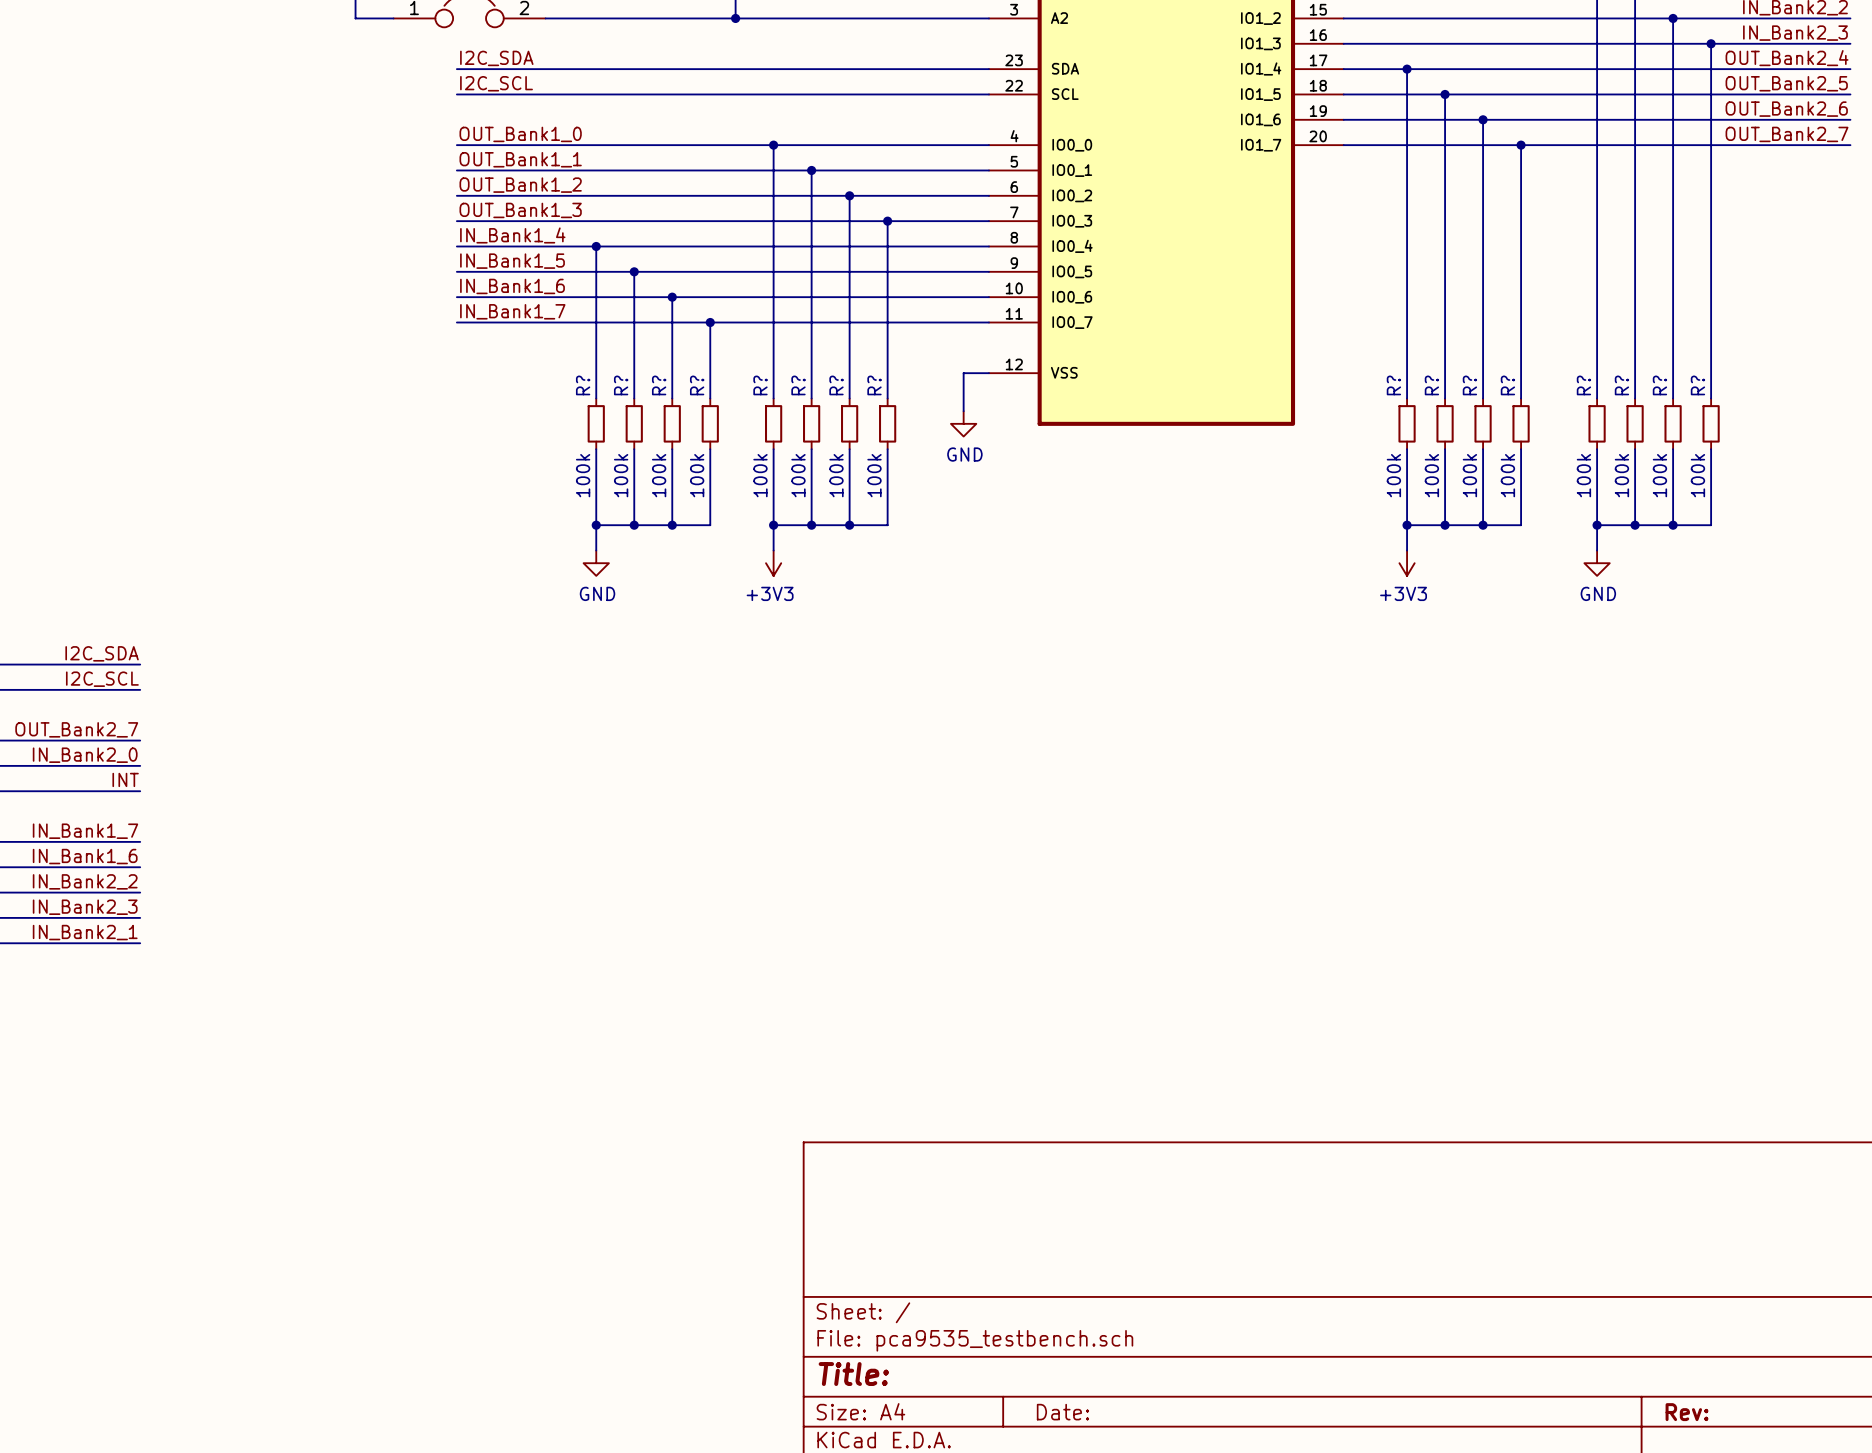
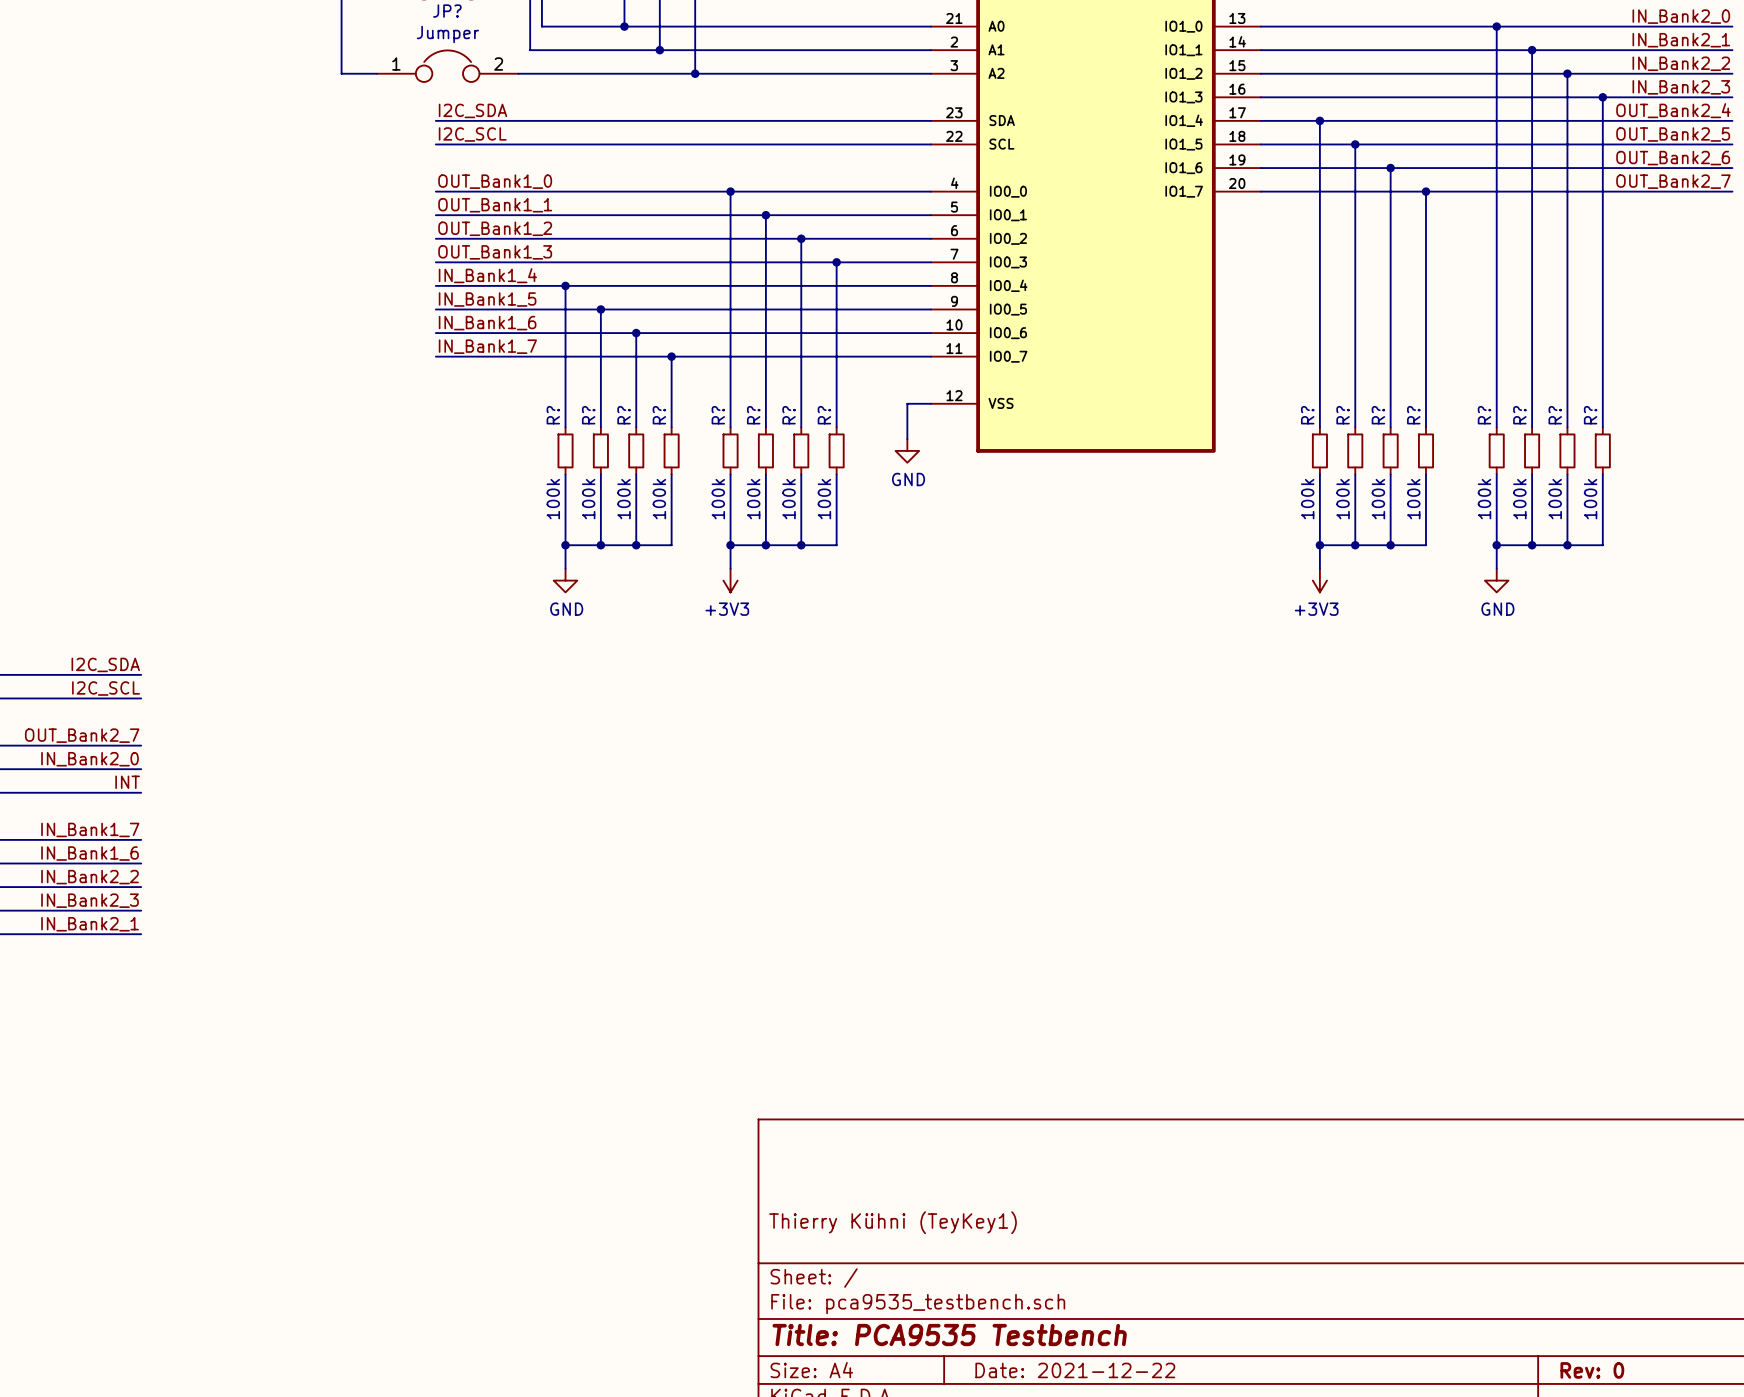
title block: none -> Thierry Kühni (TeyKey1) (893, 1222)
title block: Title: (853, 1374) -> Title: PCA9535 Testbench (949, 1335)
title block: Date: (1062, 1412) -> Date: 2021-12-22 (1075, 1370)
title block: Rev: (1687, 1412) -> Rev: 0 (1592, 1370)

